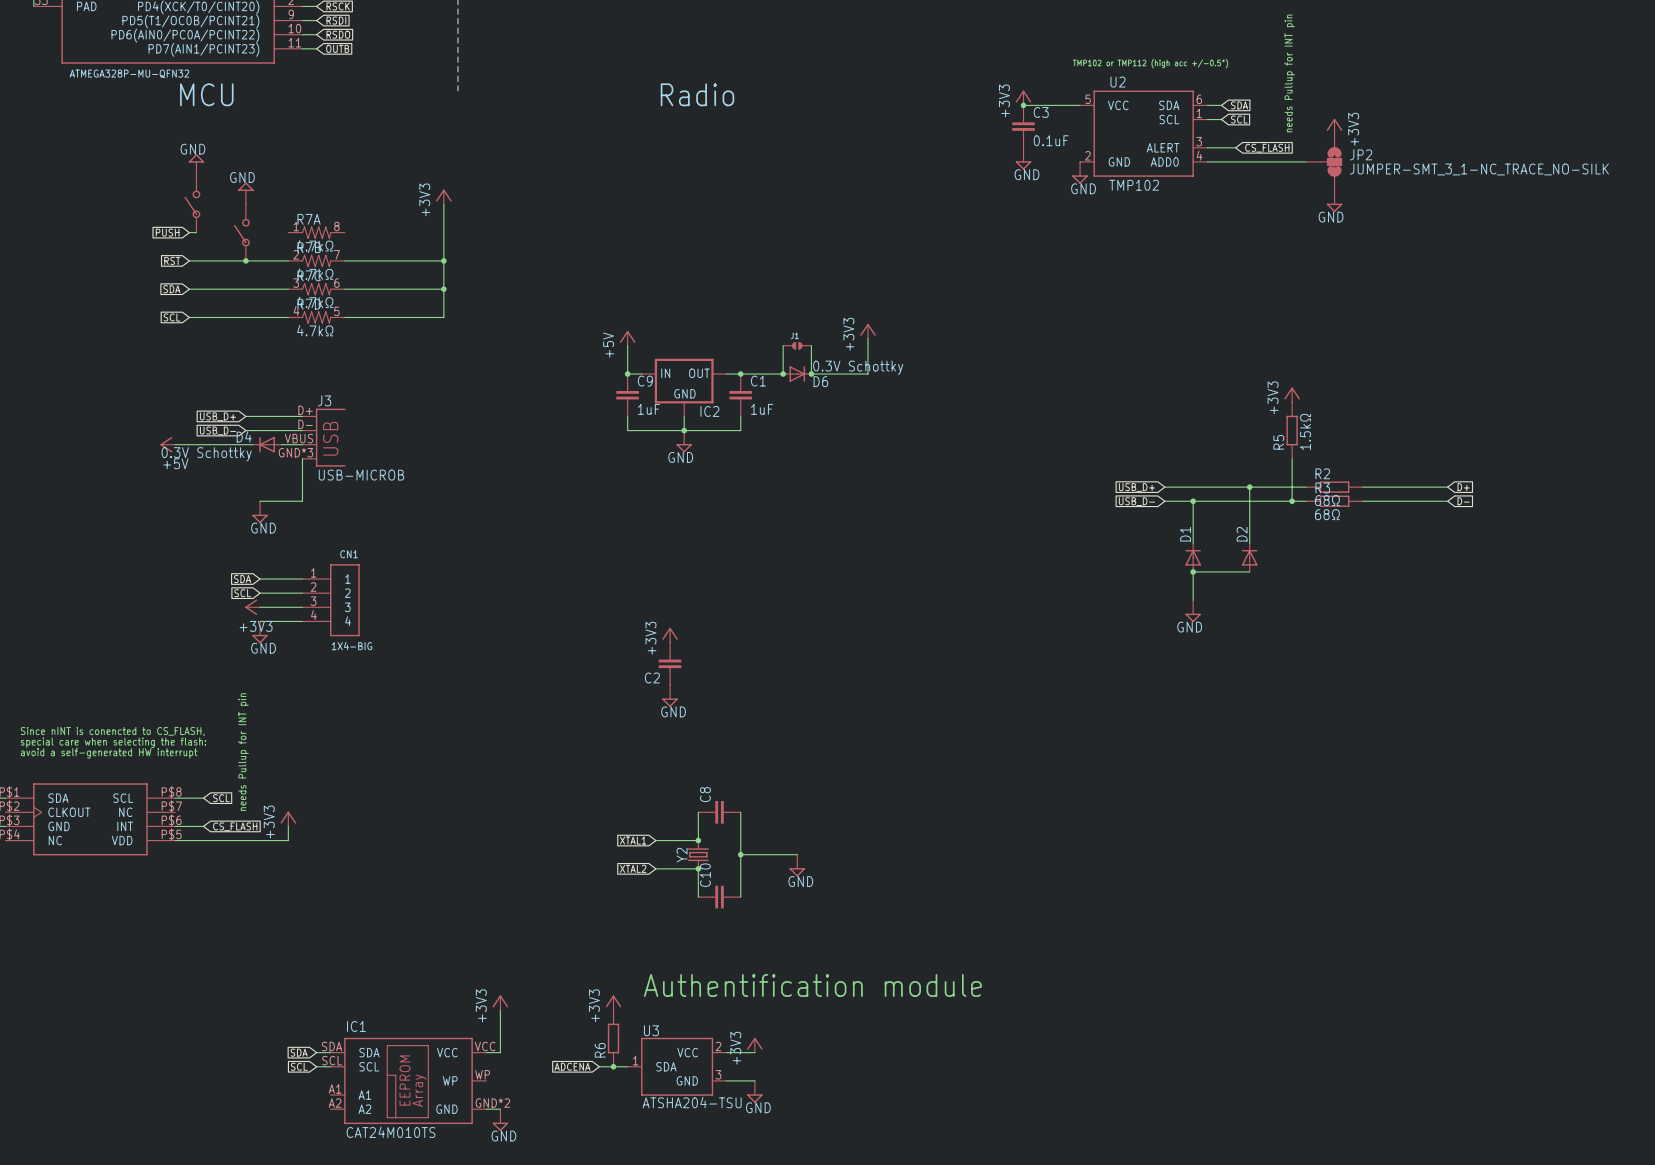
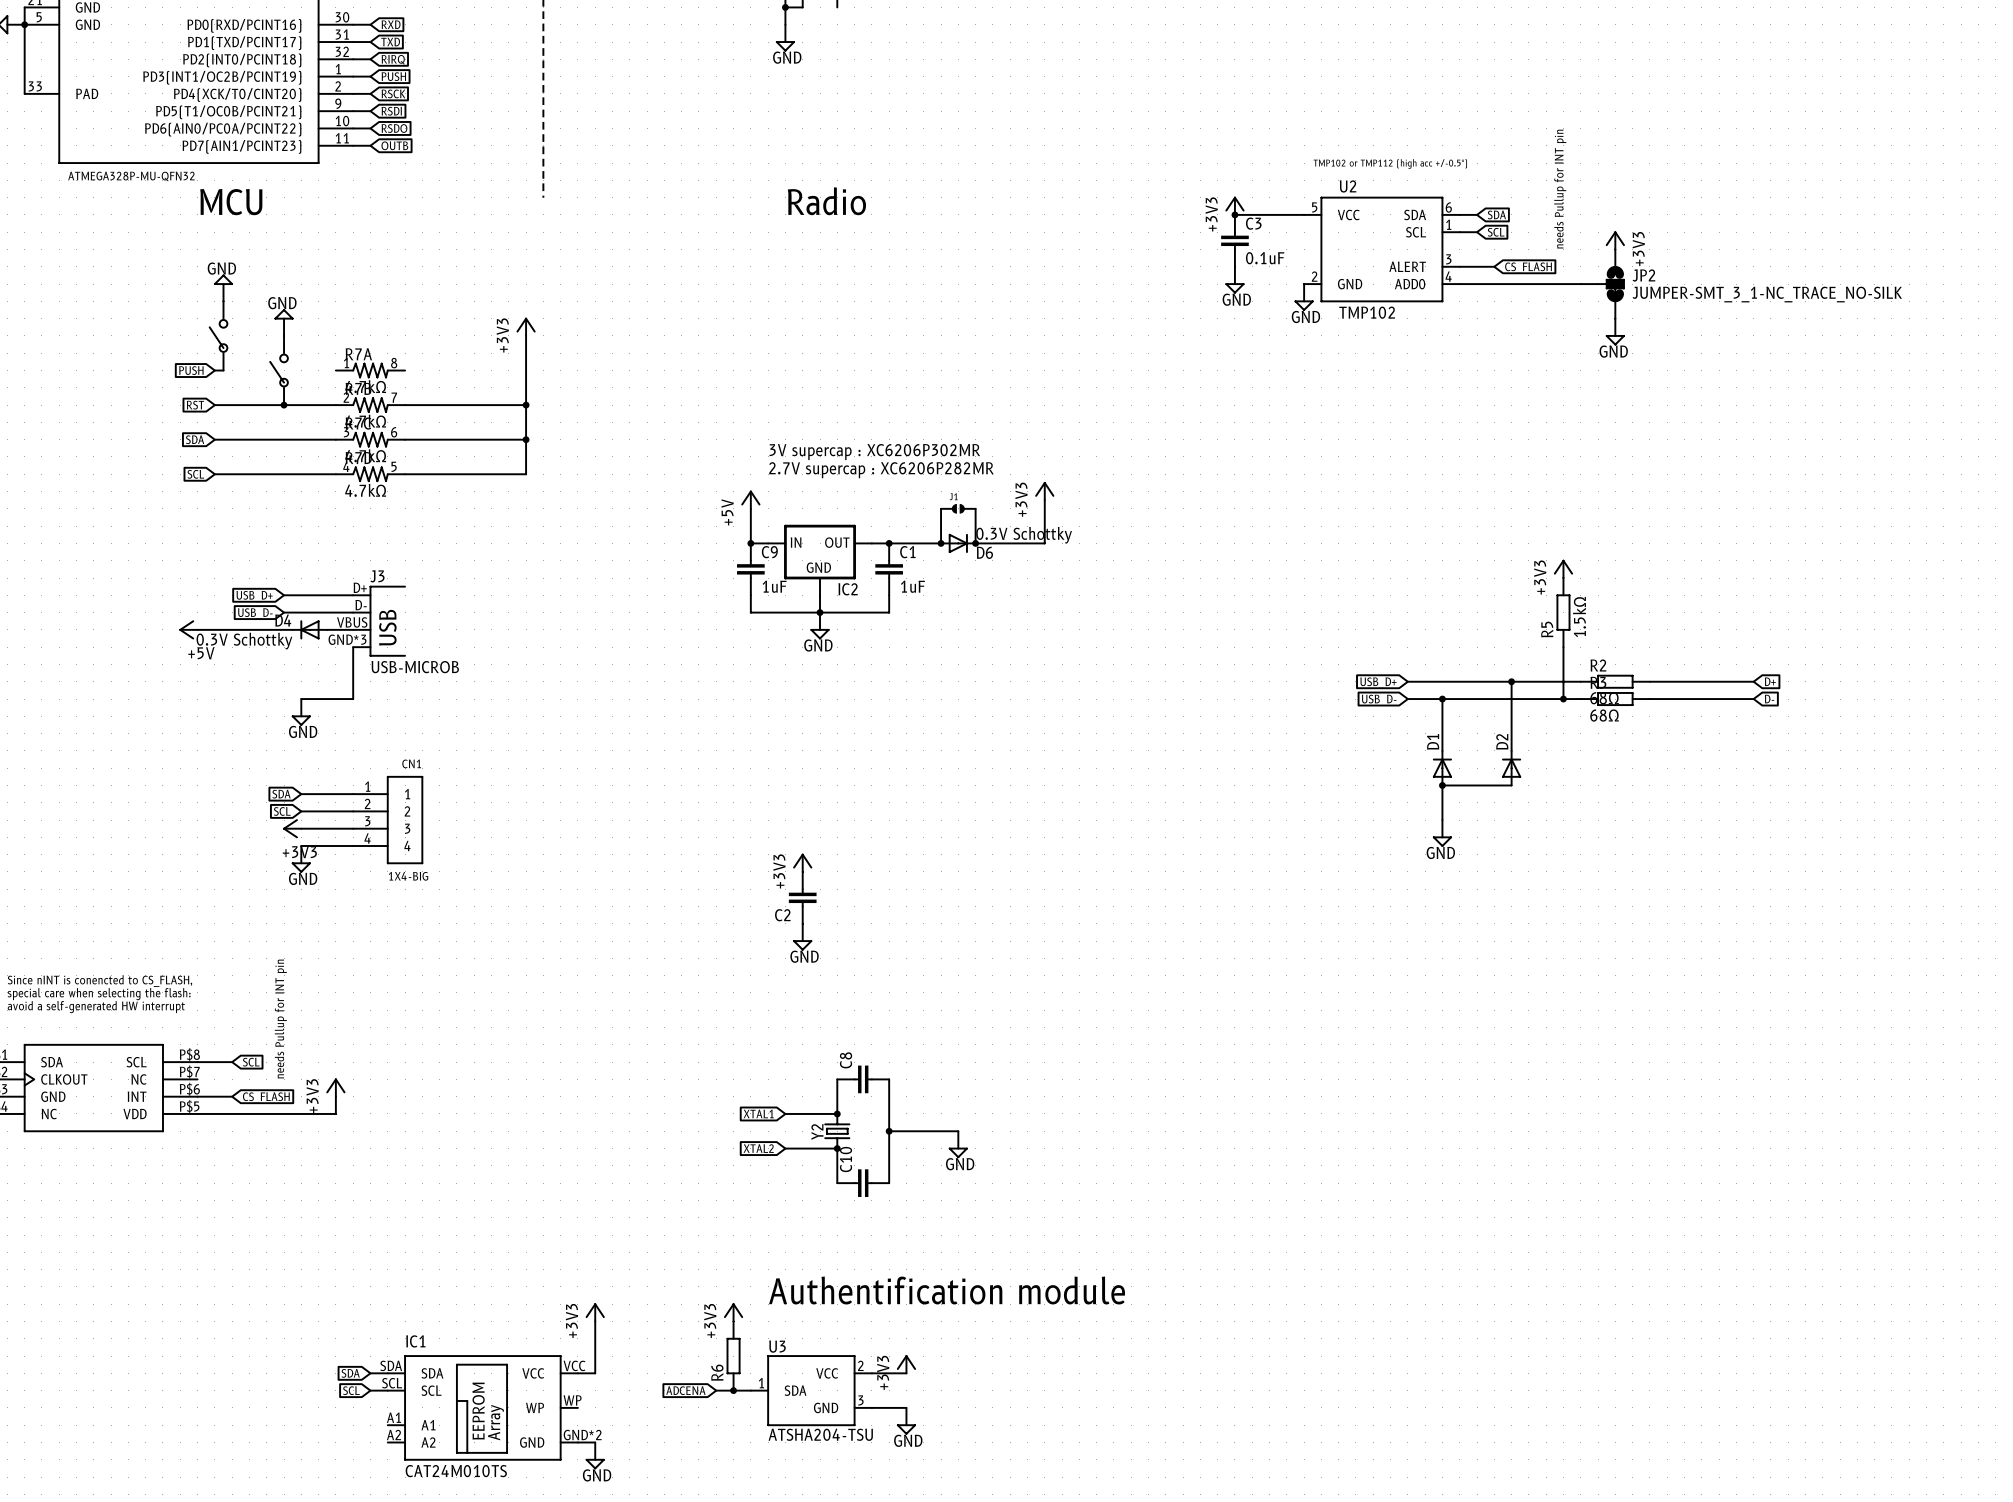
text: none -> 3V supercap : XC6206P302MR (874, 452)
text: none -> 2.7V supercap : XC6206P282MR (881, 470)

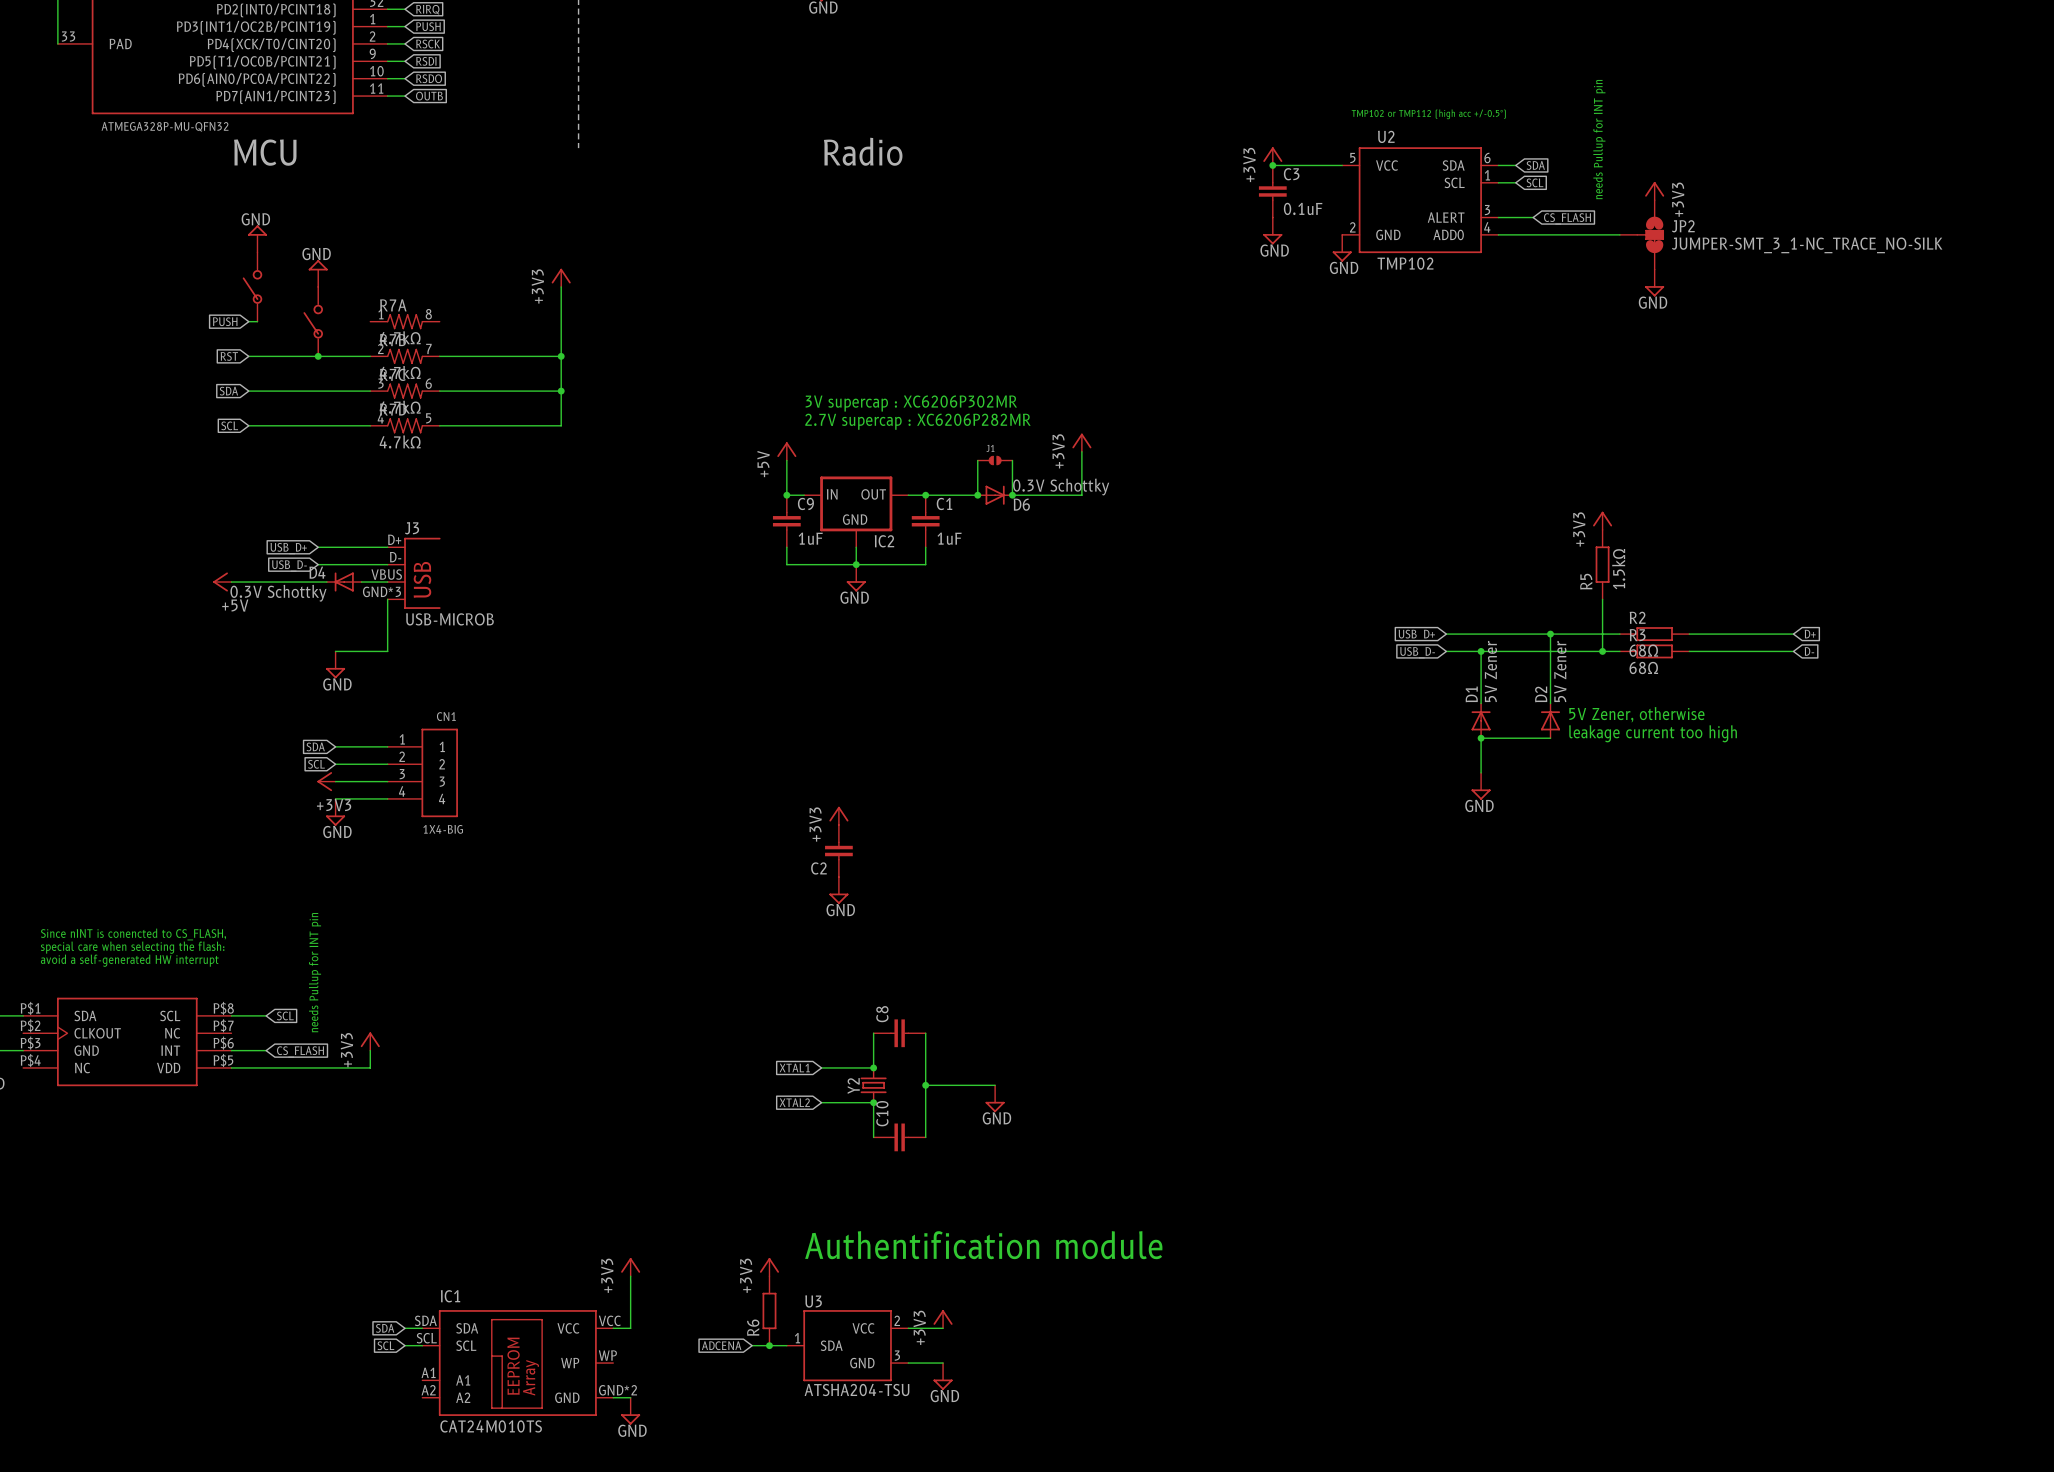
D1 value: none -> 5V Zener (1490, 671)
D2 value: none -> 5V Zener (1560, 671)
text: none -> 5V Zener, otherwise (1636, 714)
text: none -> leakage current too high (1653, 733)

